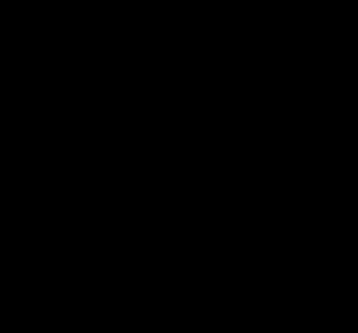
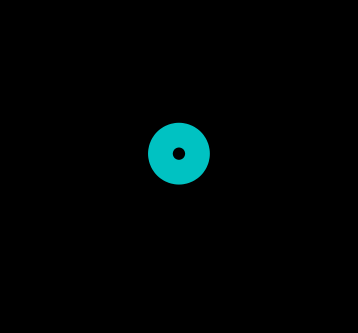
part: none -> (178, 153)

